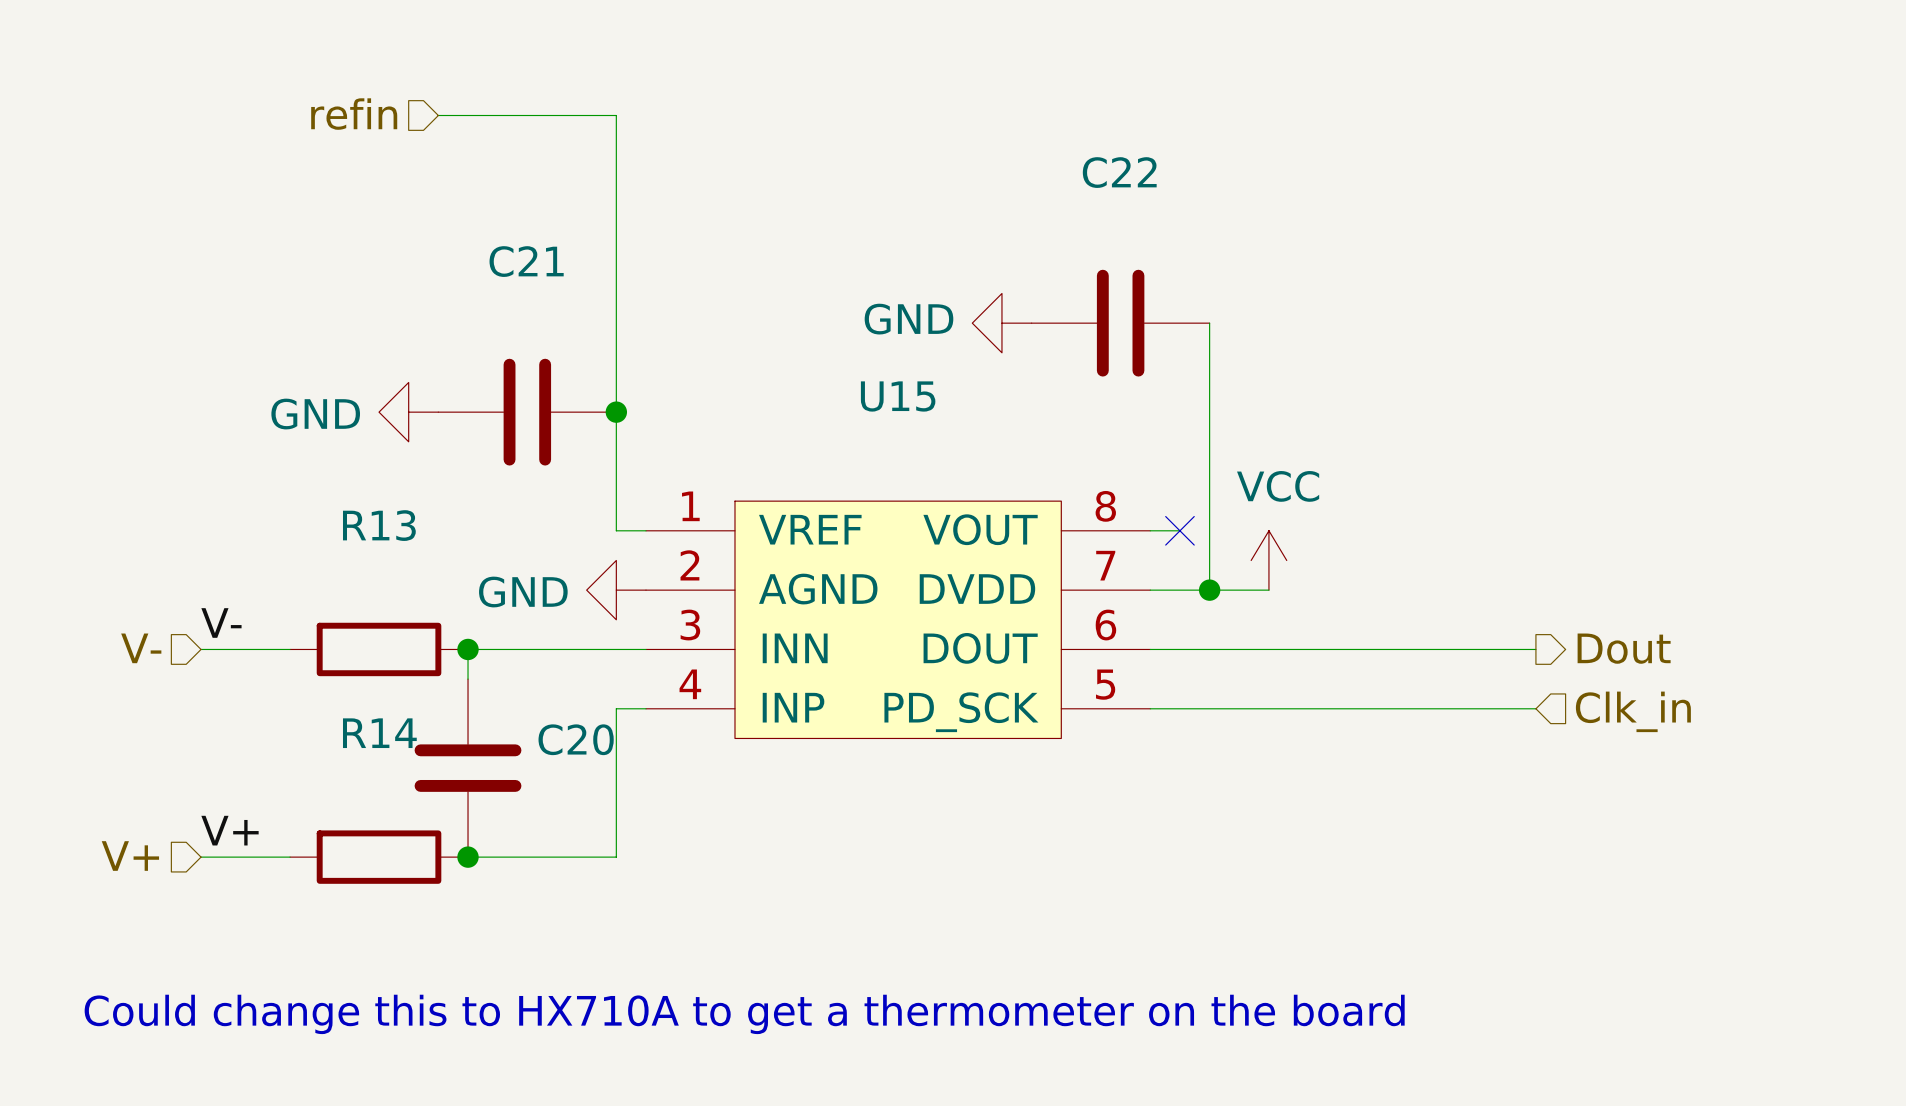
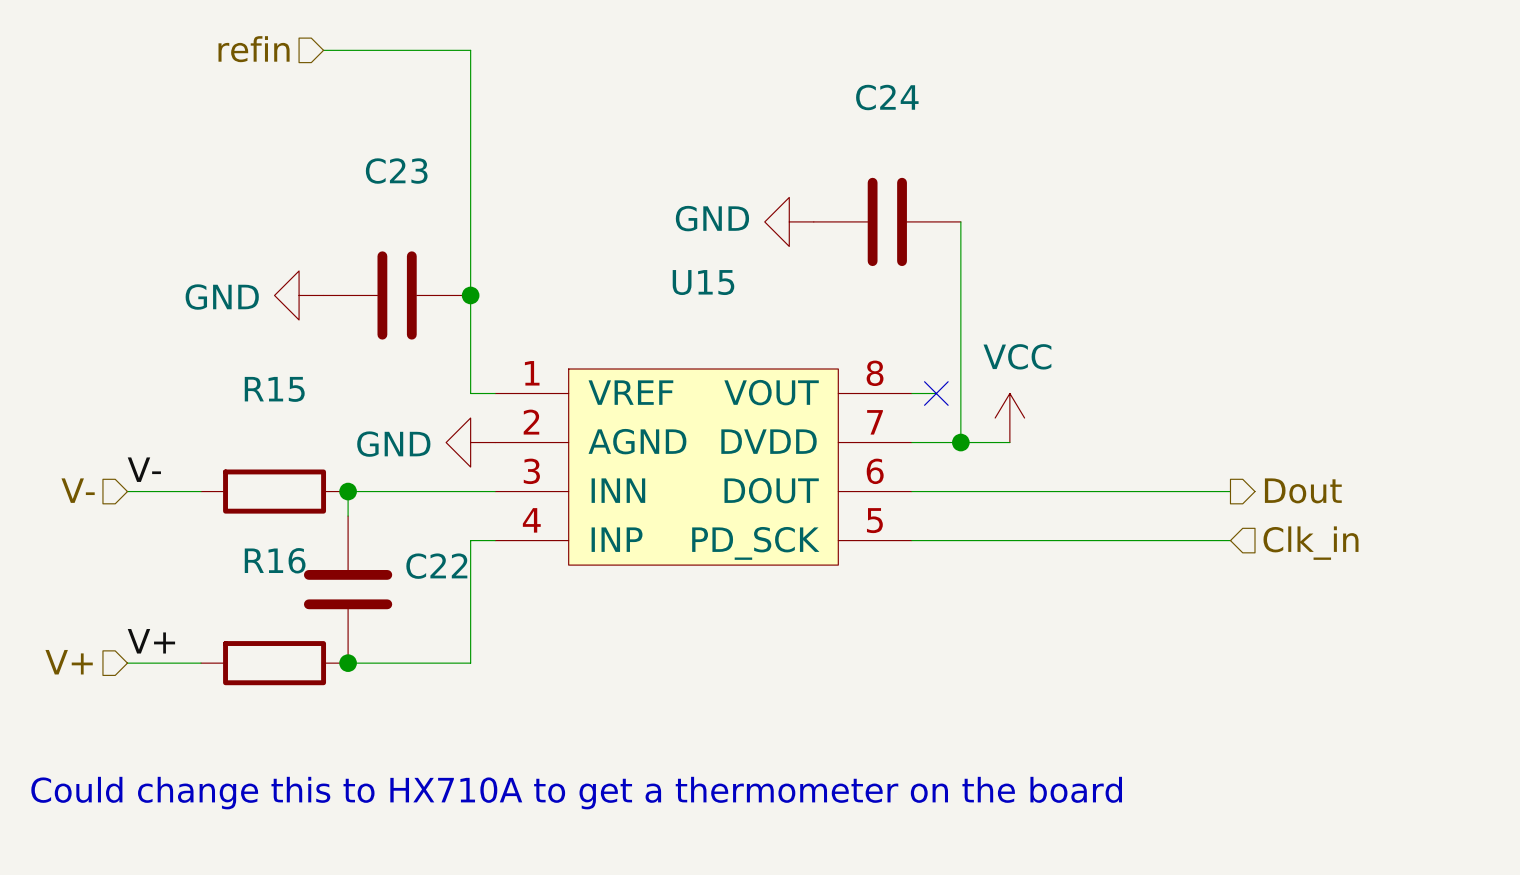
C22 name: C22 (1119, 172) -> C24 (887, 97)
C21 name: C21 (526, 261) -> C23 (396, 171)
R13 name: R13 (379, 525) -> R15 (274, 389)
R14 name: R14 (379, 733) -> R16 (275, 560)
C20 name: C20 (576, 739) -> C22 (436, 566)

